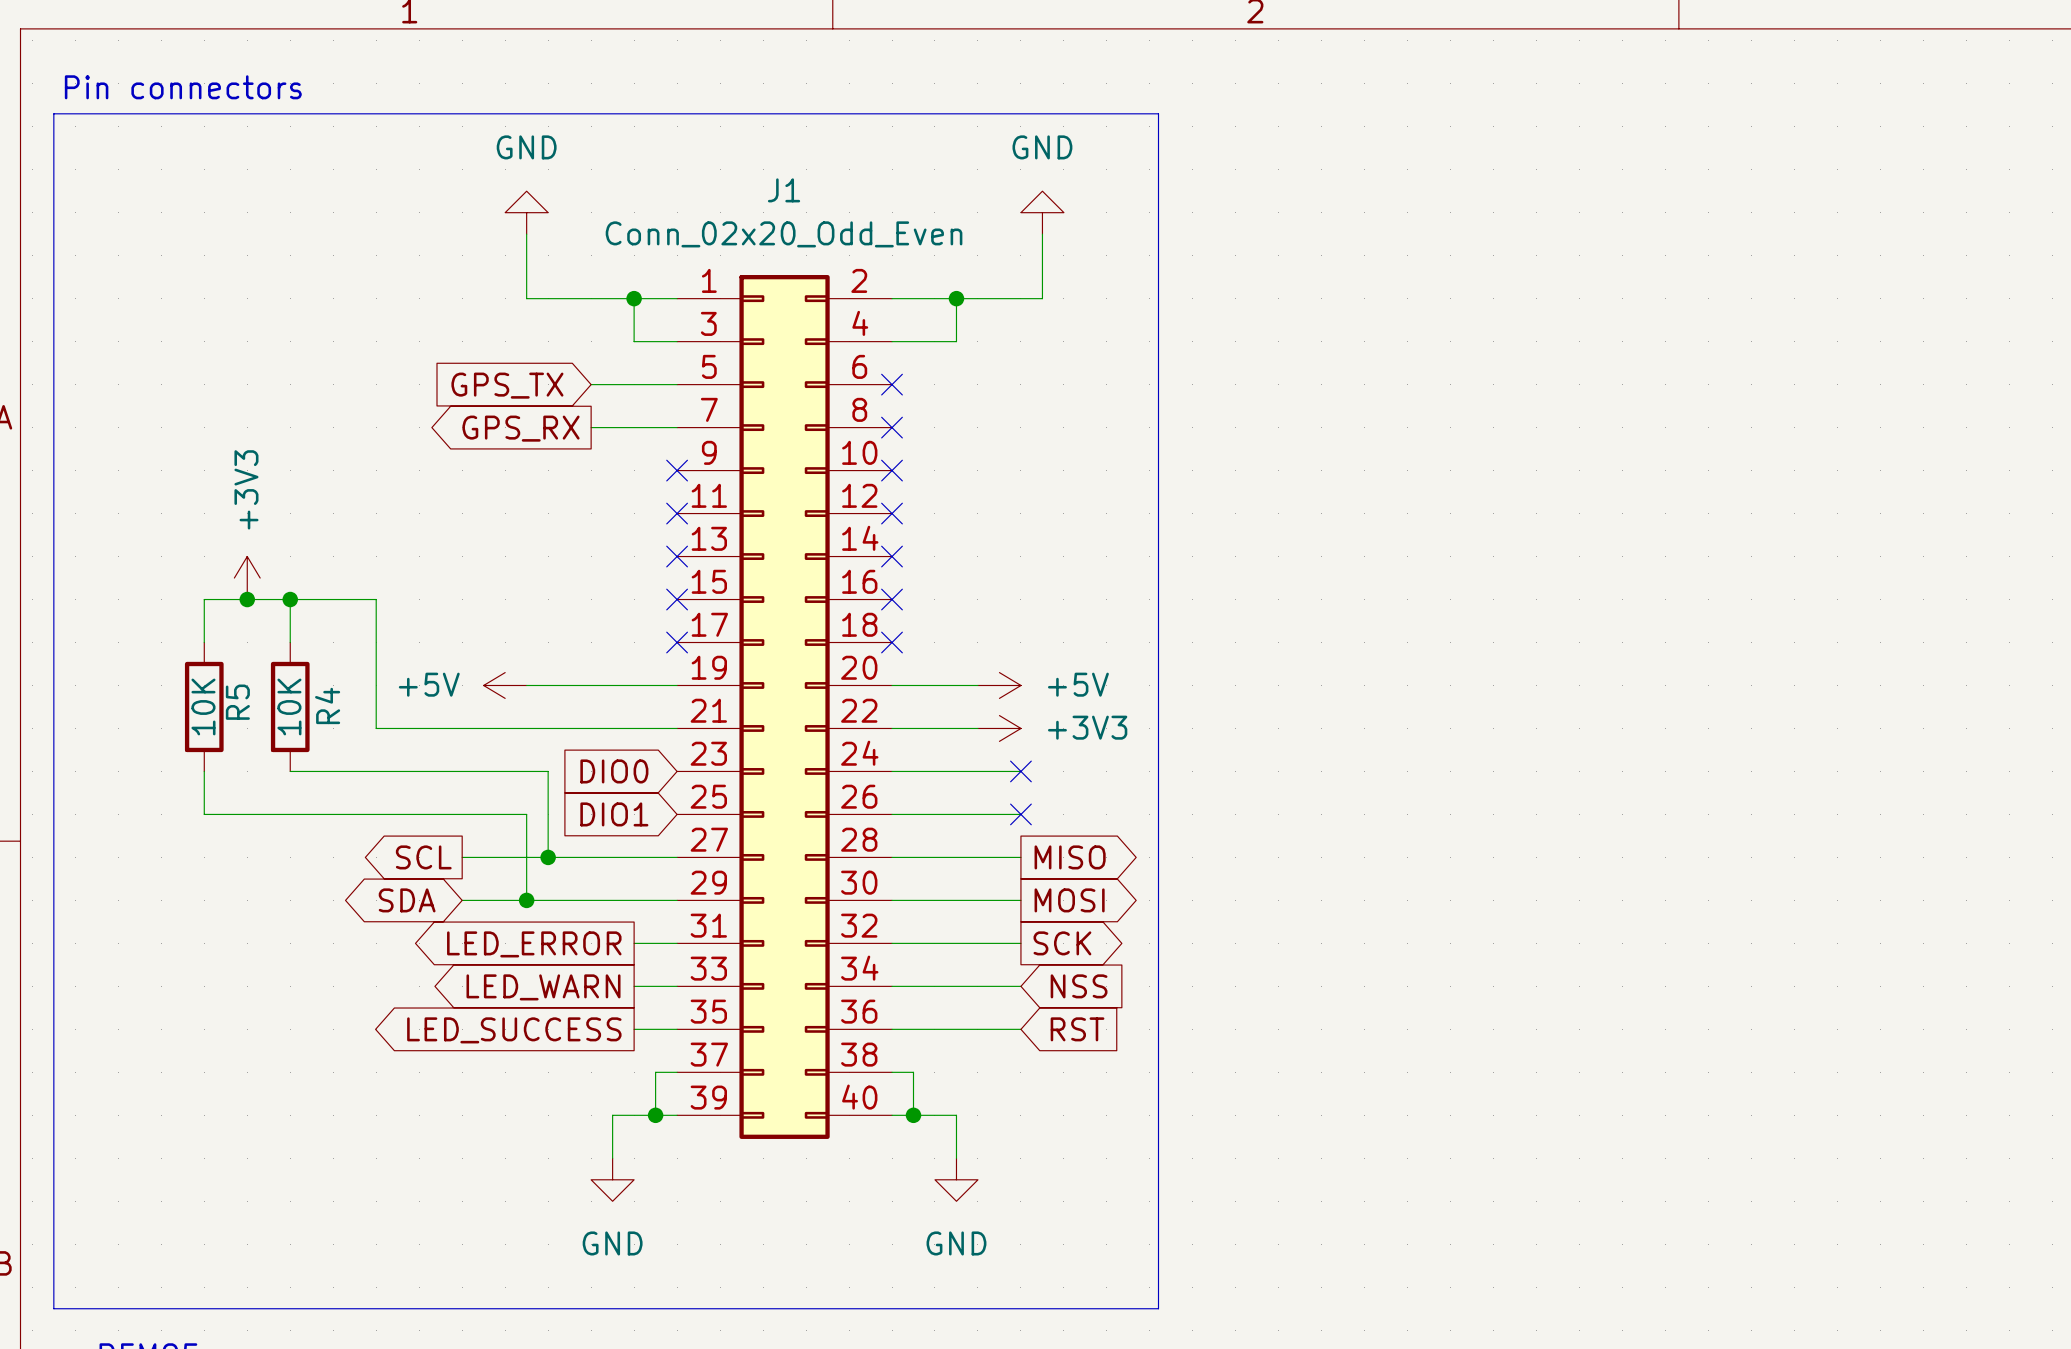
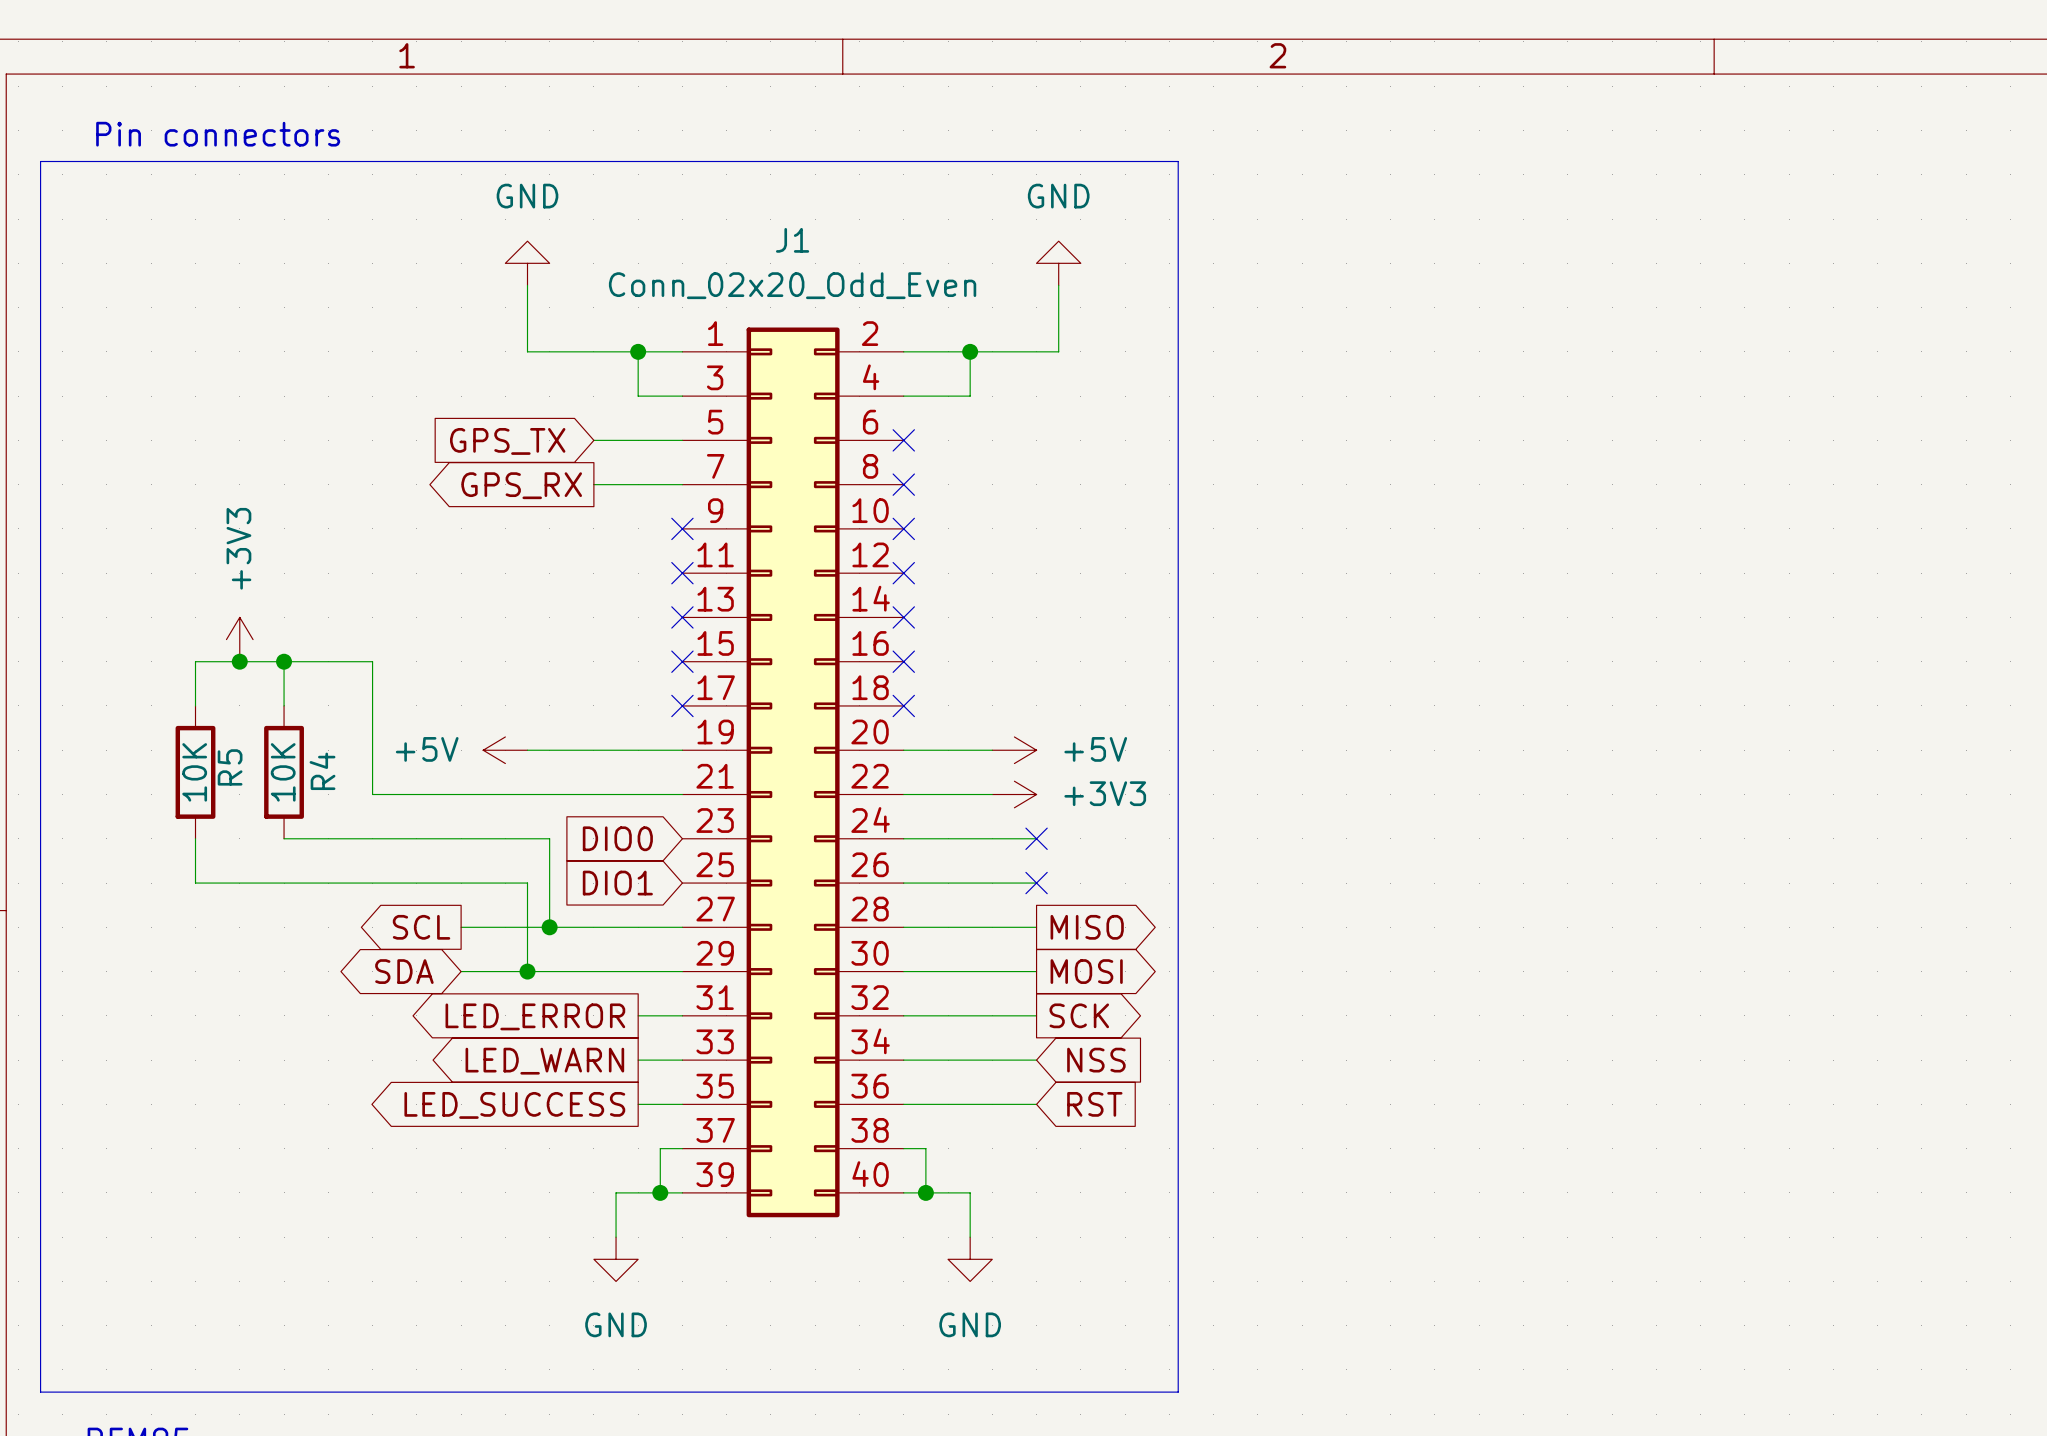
text position: Pin connectors (183, 87) -> Pin connectors (218, 134)

